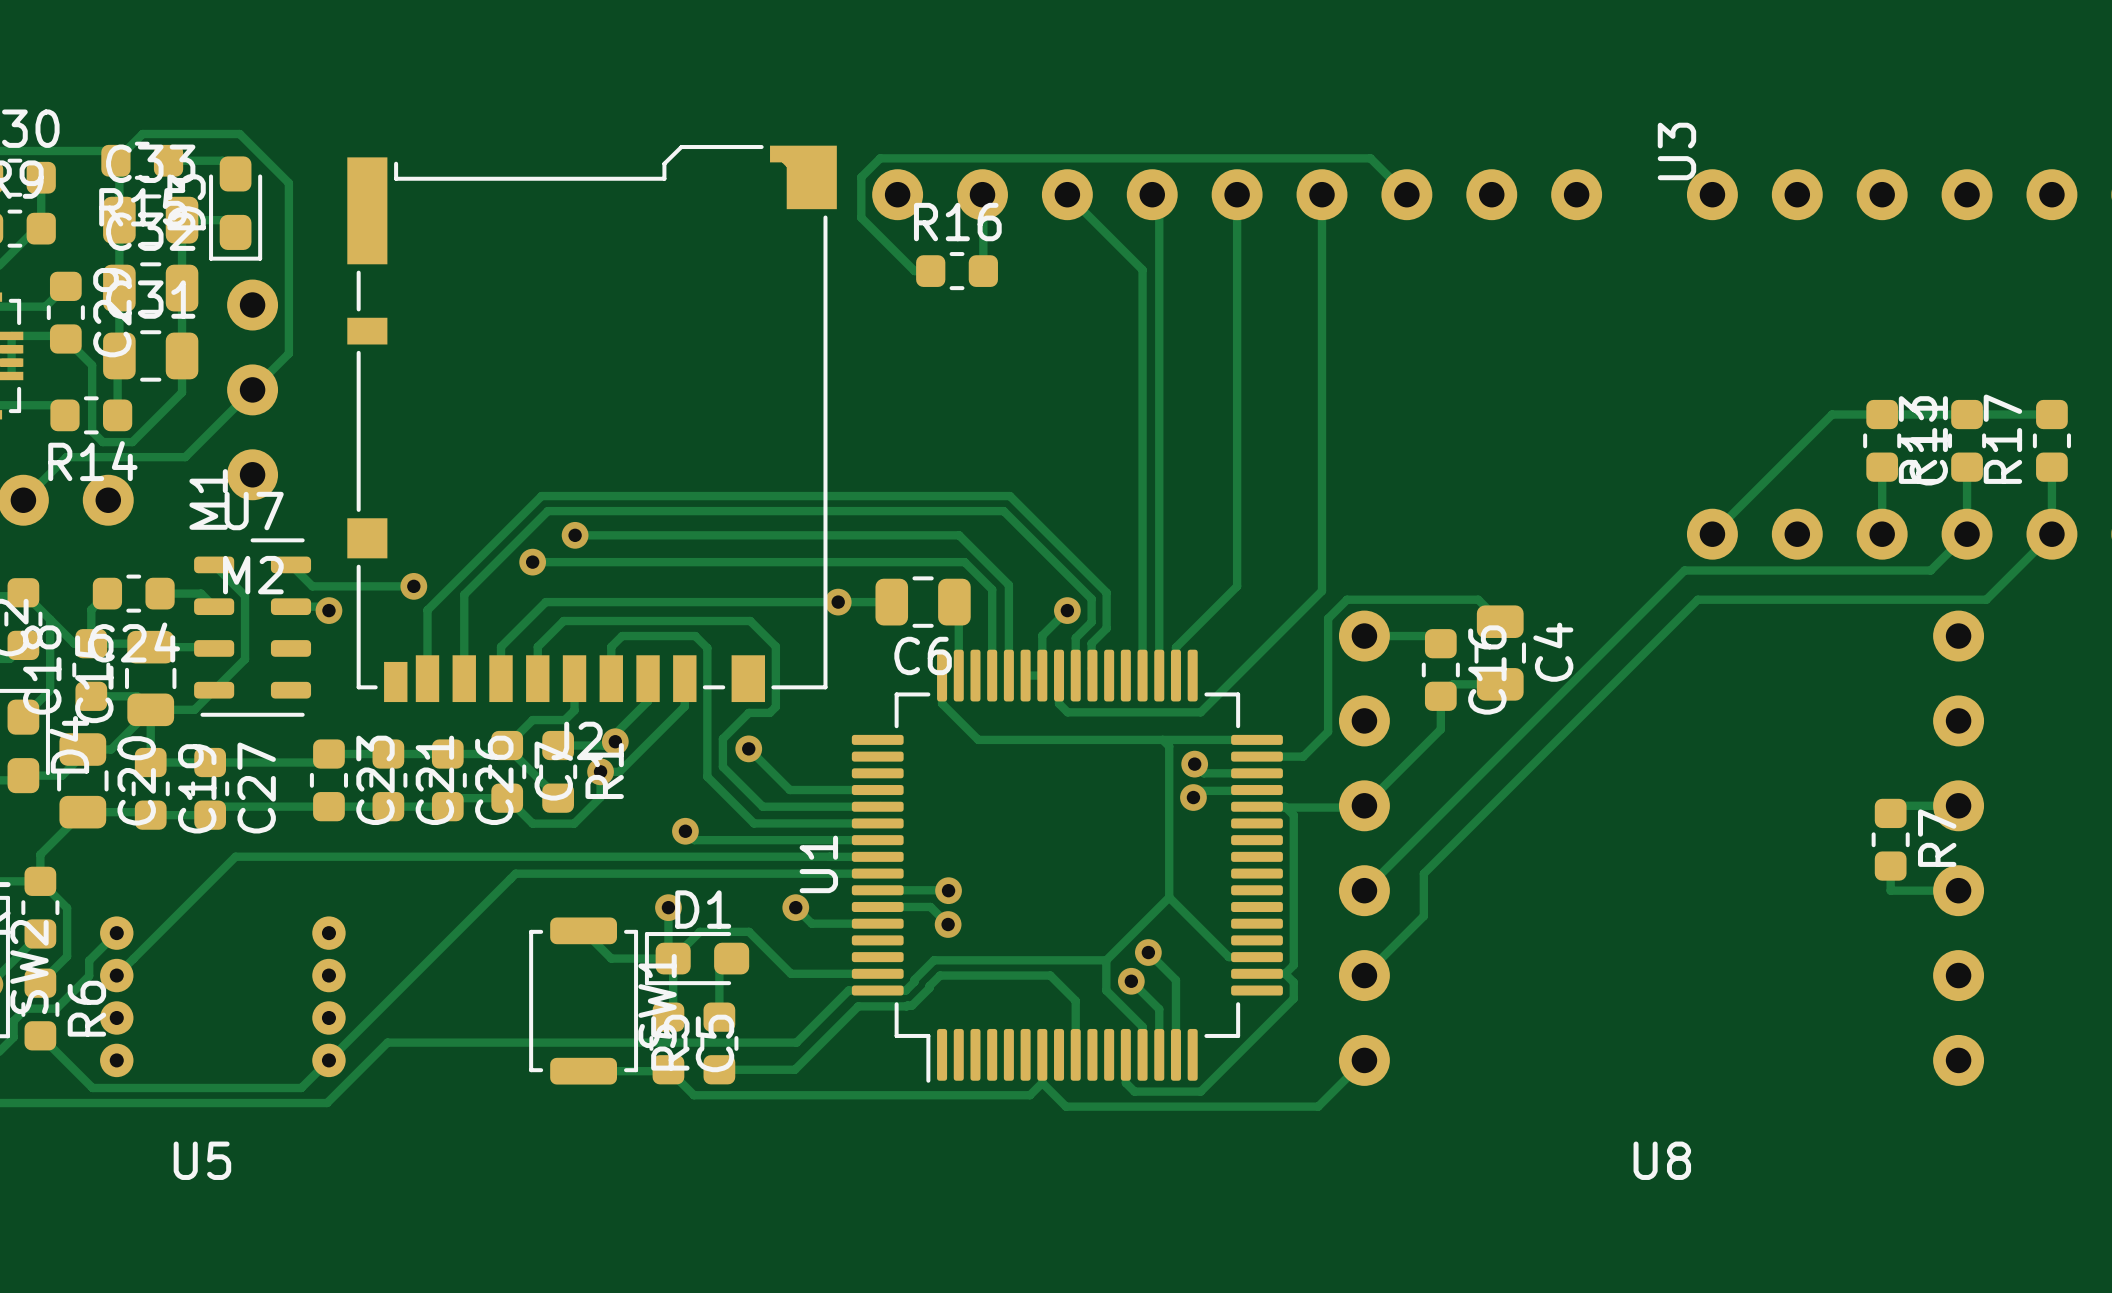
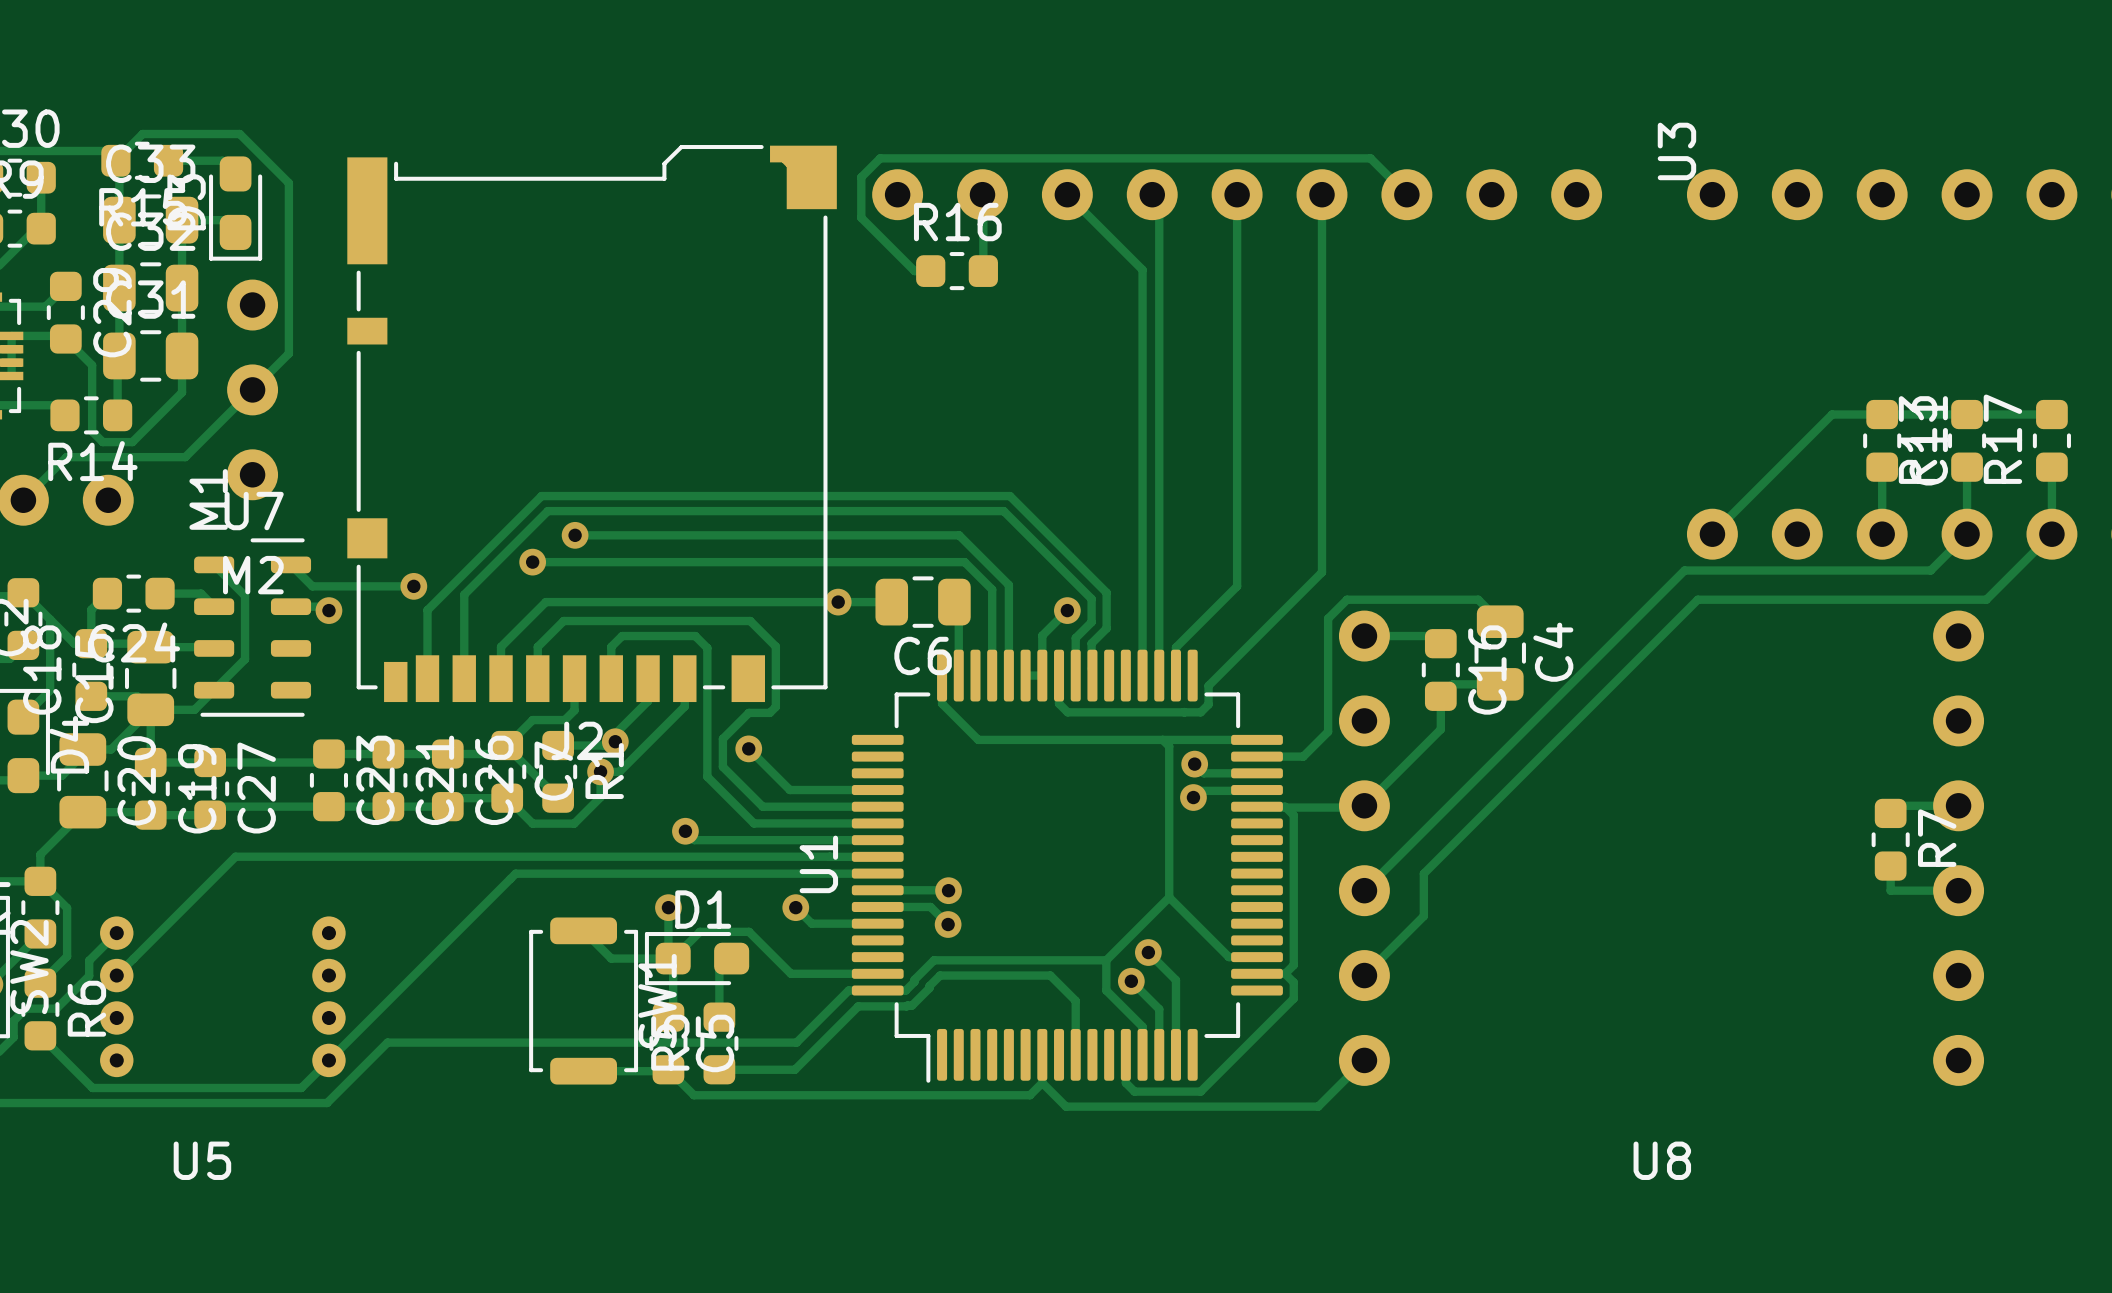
track: (1322, 572) (1322, 591) (1208, 704) -> (1322, 572) (1208, 685) (1208, 704)

